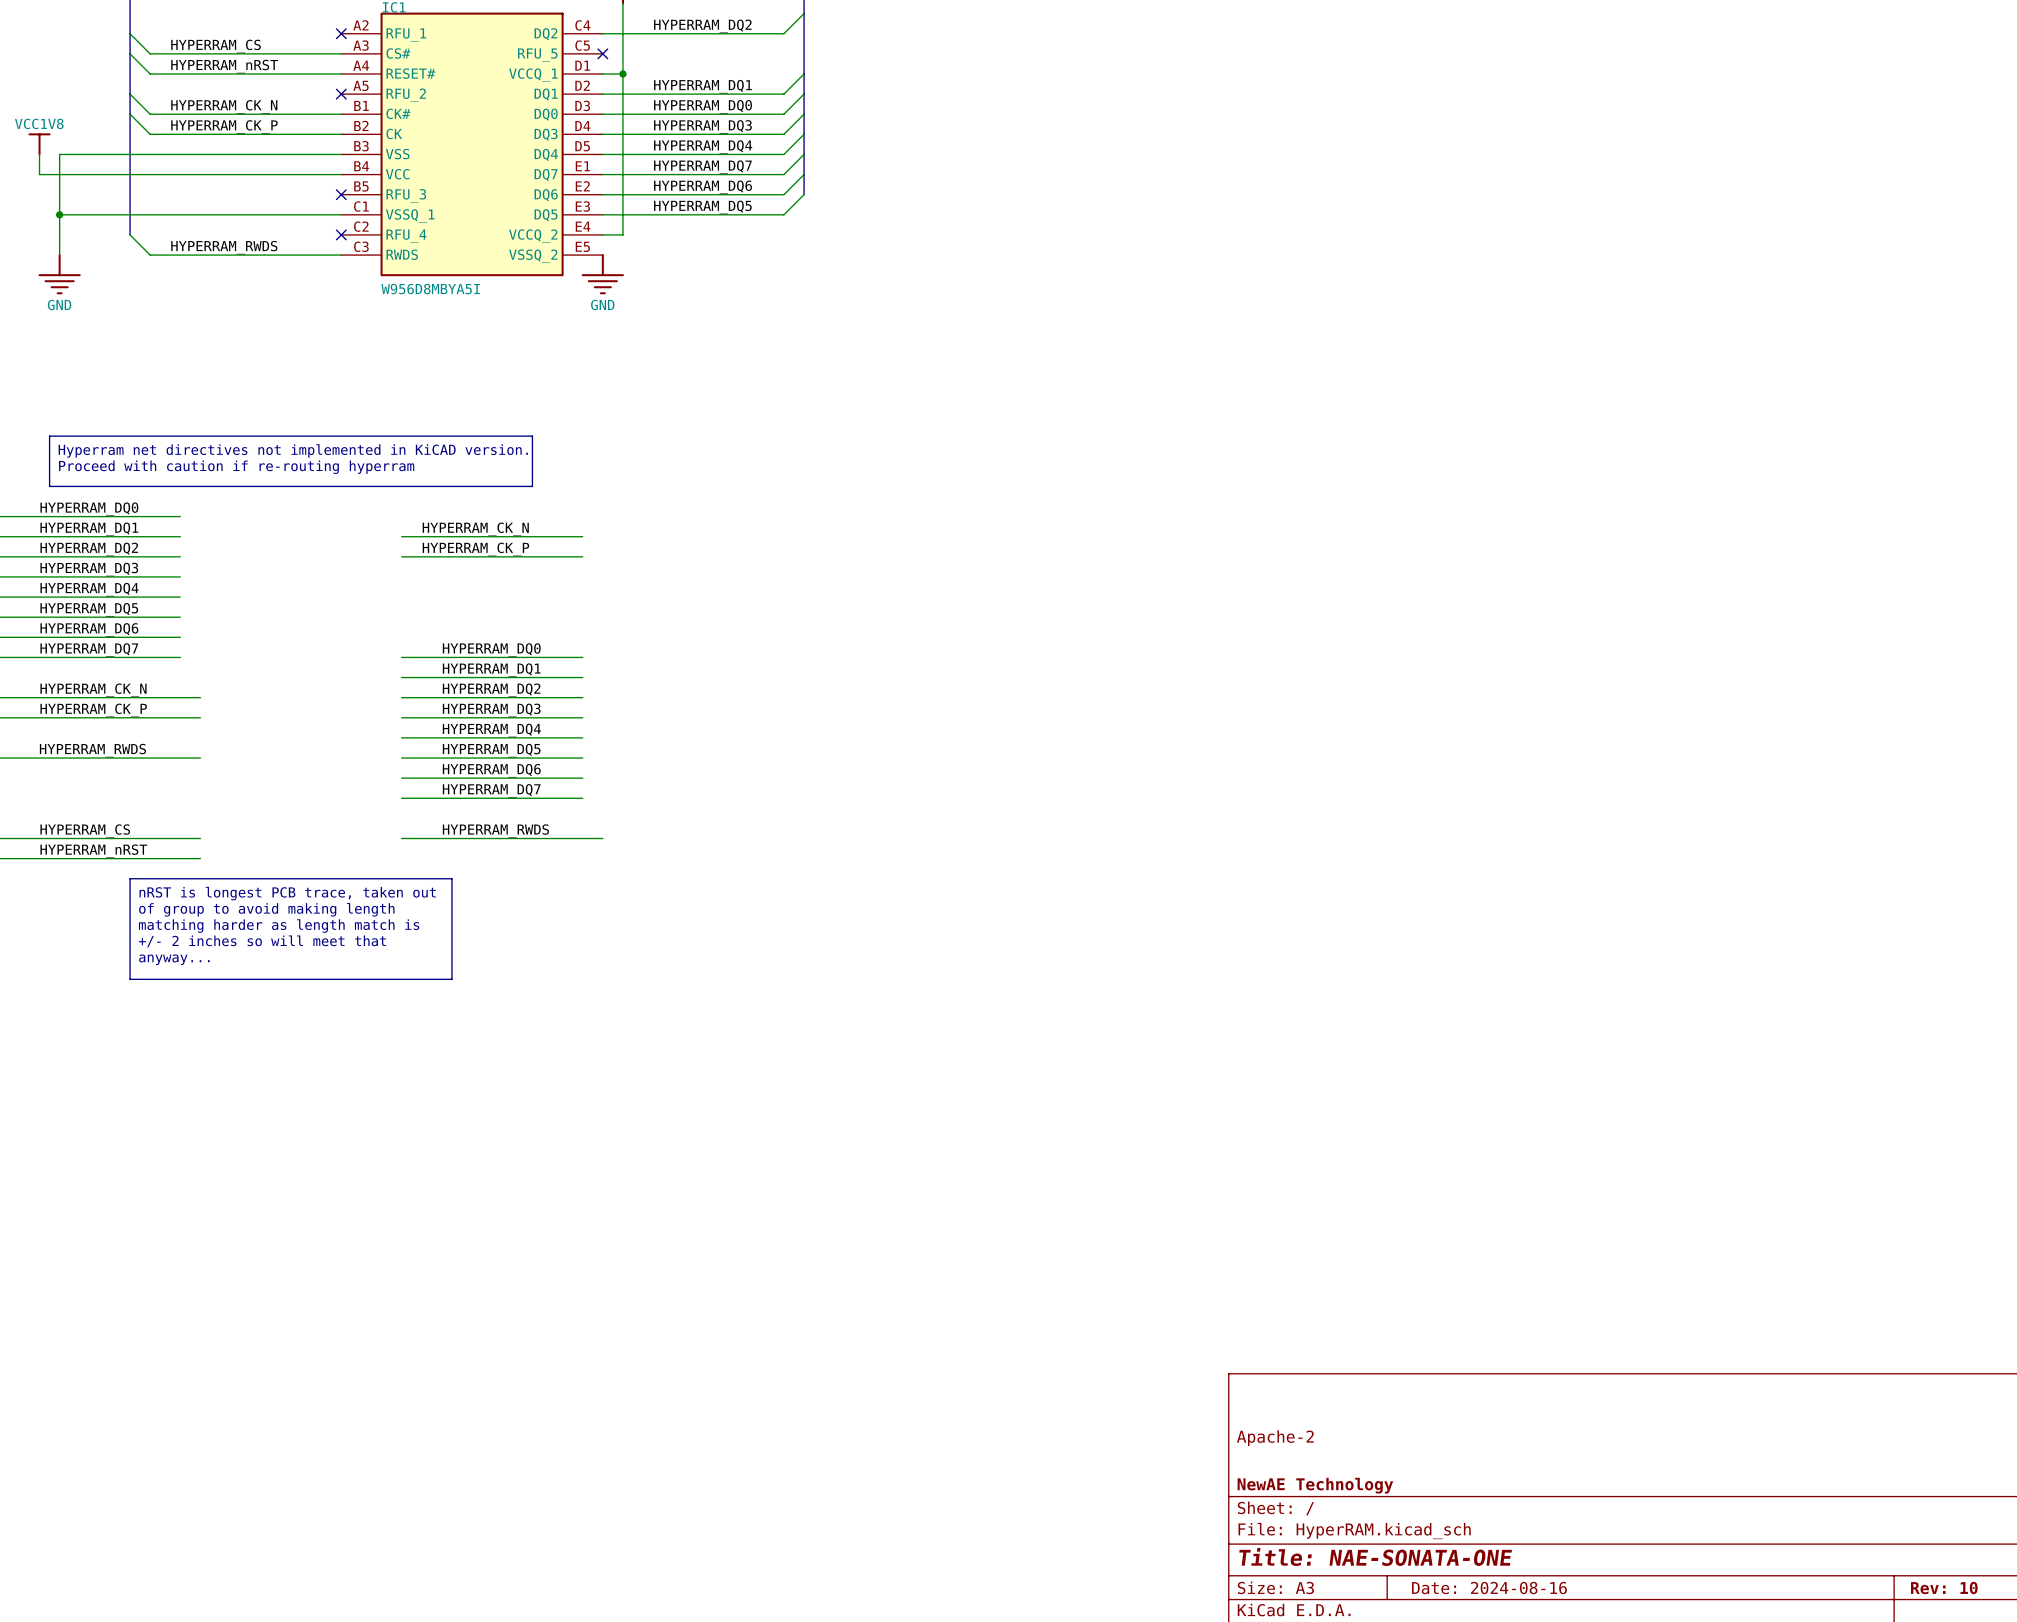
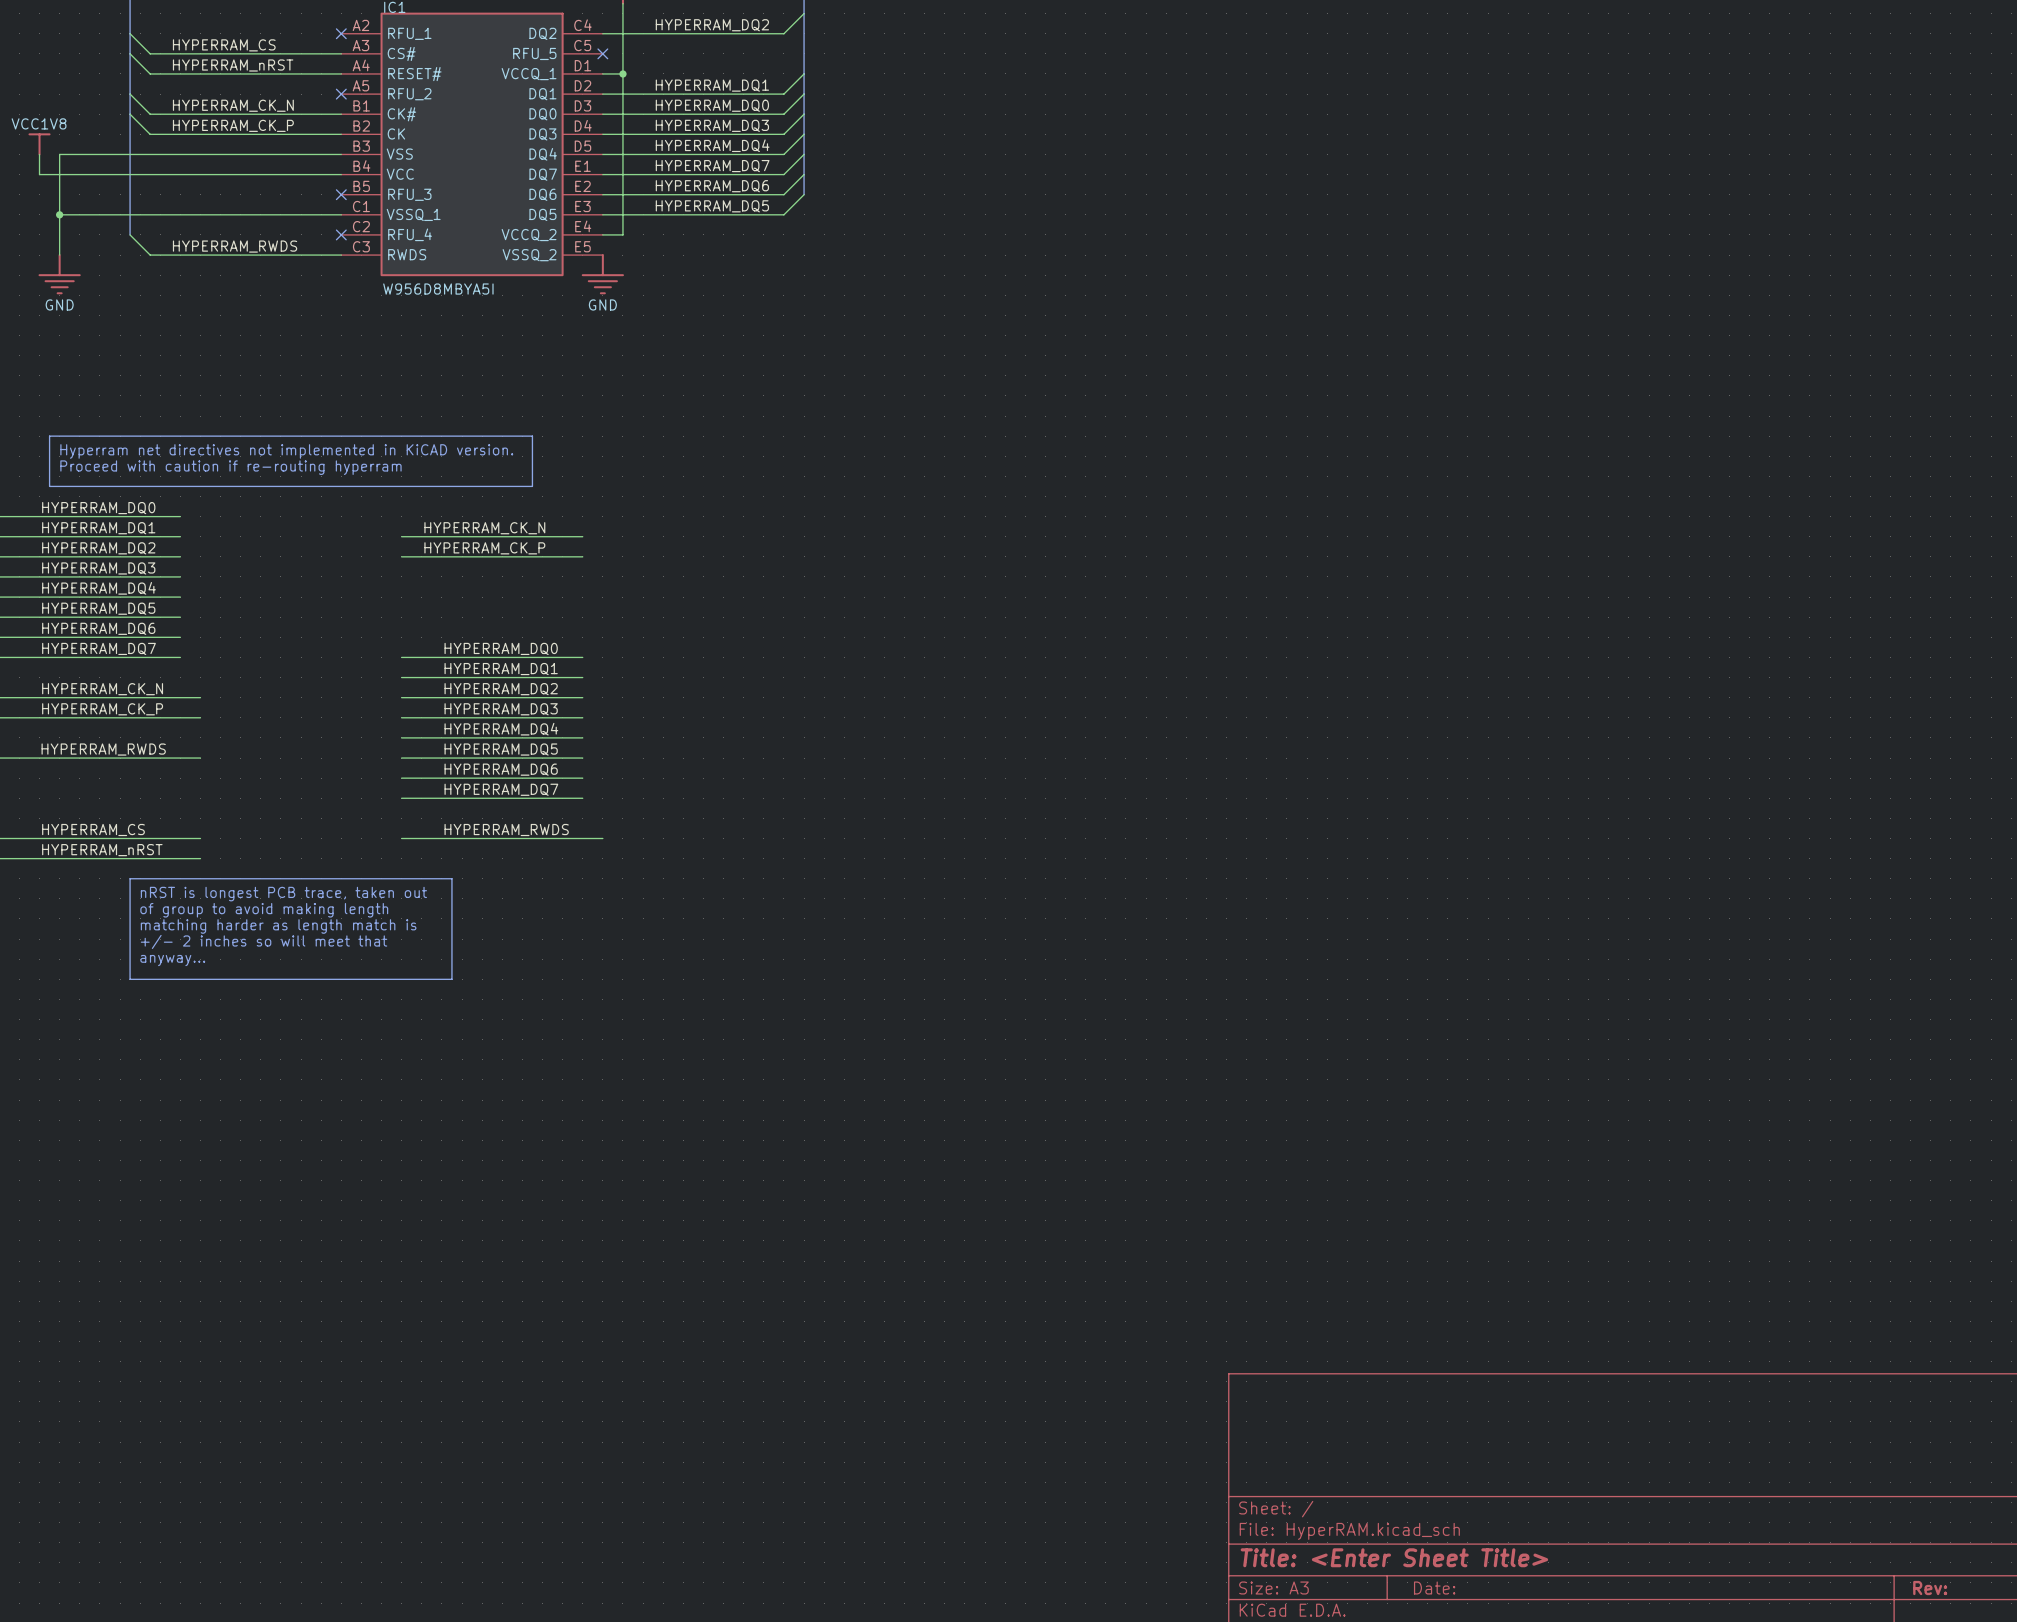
title block: Apache-2 (1275, 1438) -> none
title block: NewAE Technology (1315, 1485) -> none
title block: Title: NAE-SONATA-ONE (1375, 1557) -> Title: <Enter Sheet Title> (1394, 1557)
title block: Date: 2024-08-16 (1489, 1588) -> Date: (1434, 1588)
title block: Rev: 10 (1944, 1588) -> Rev: (1930, 1588)

